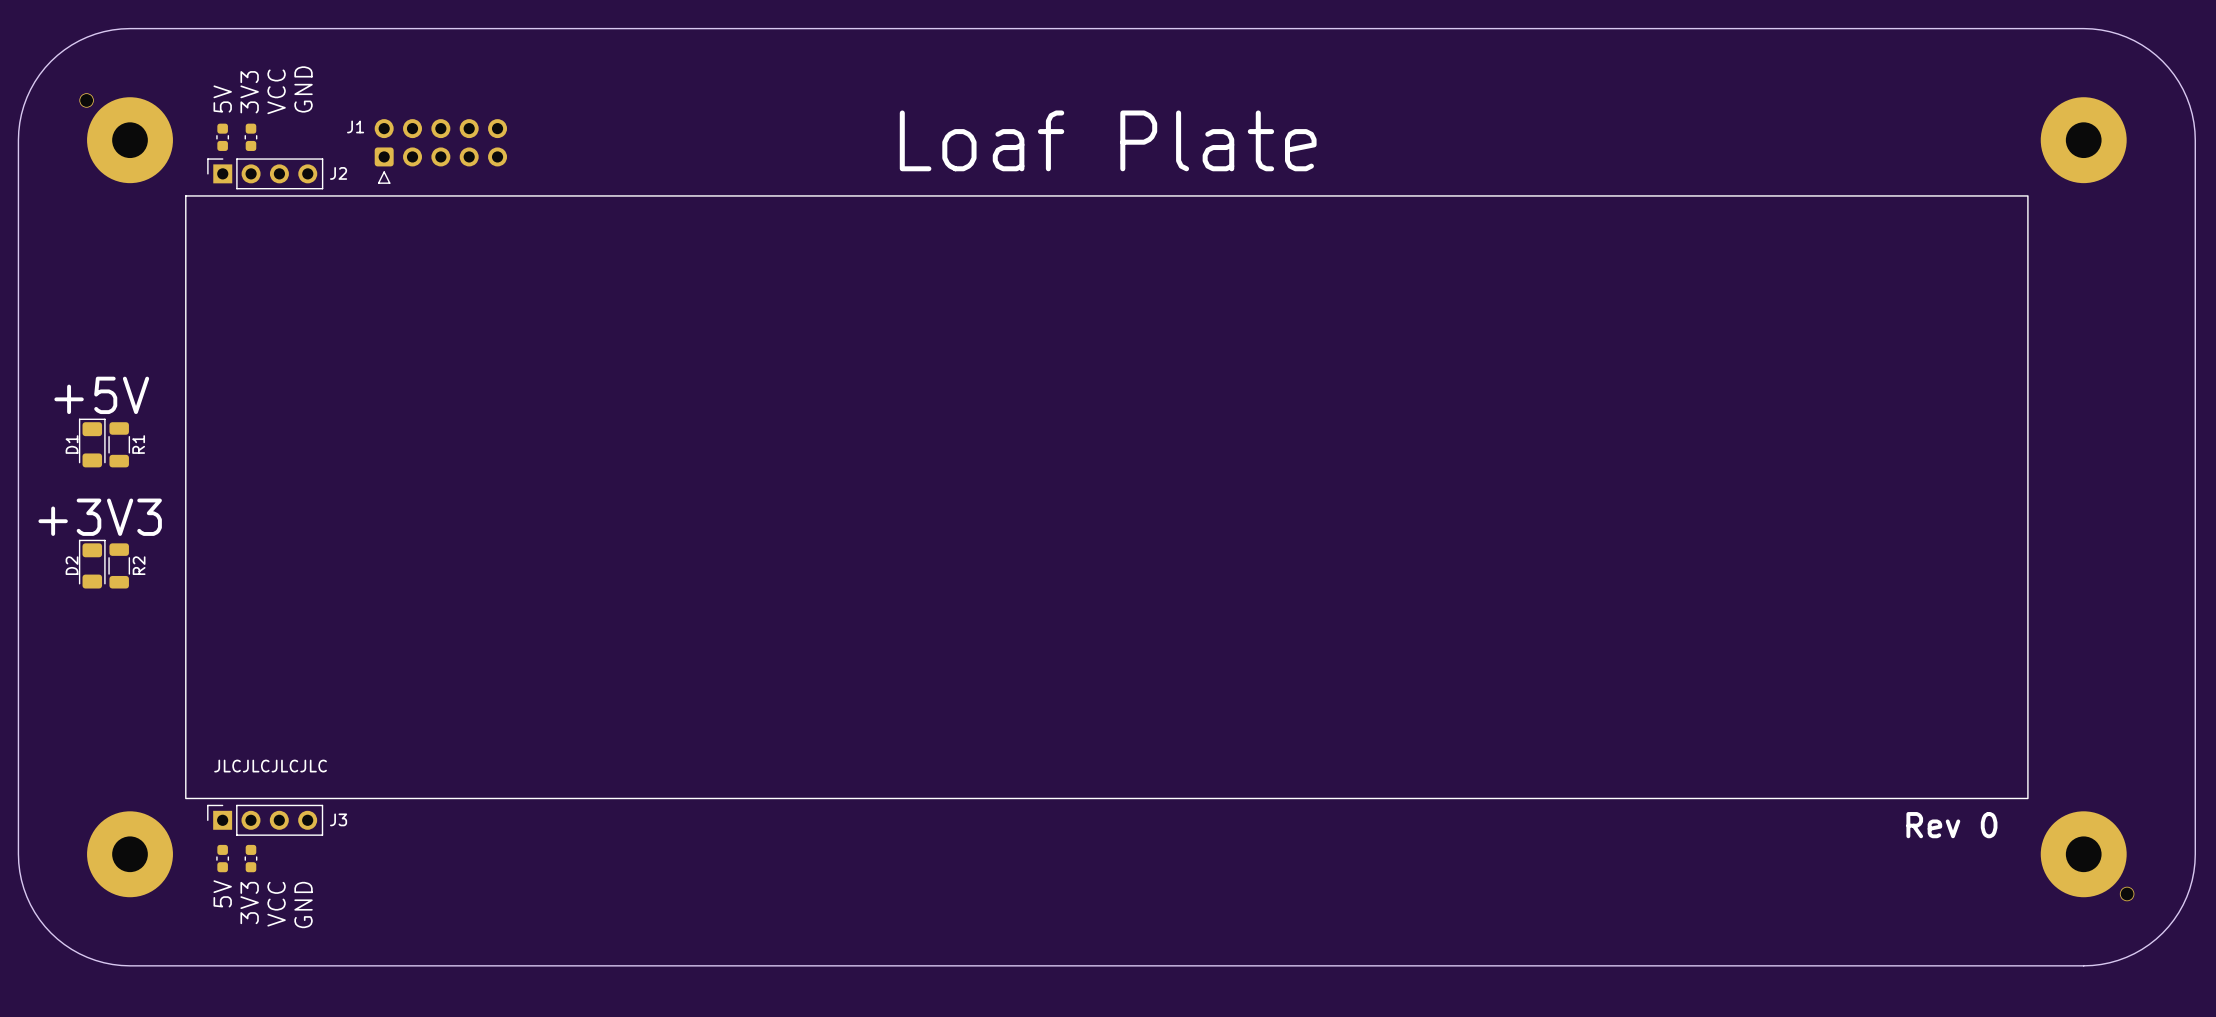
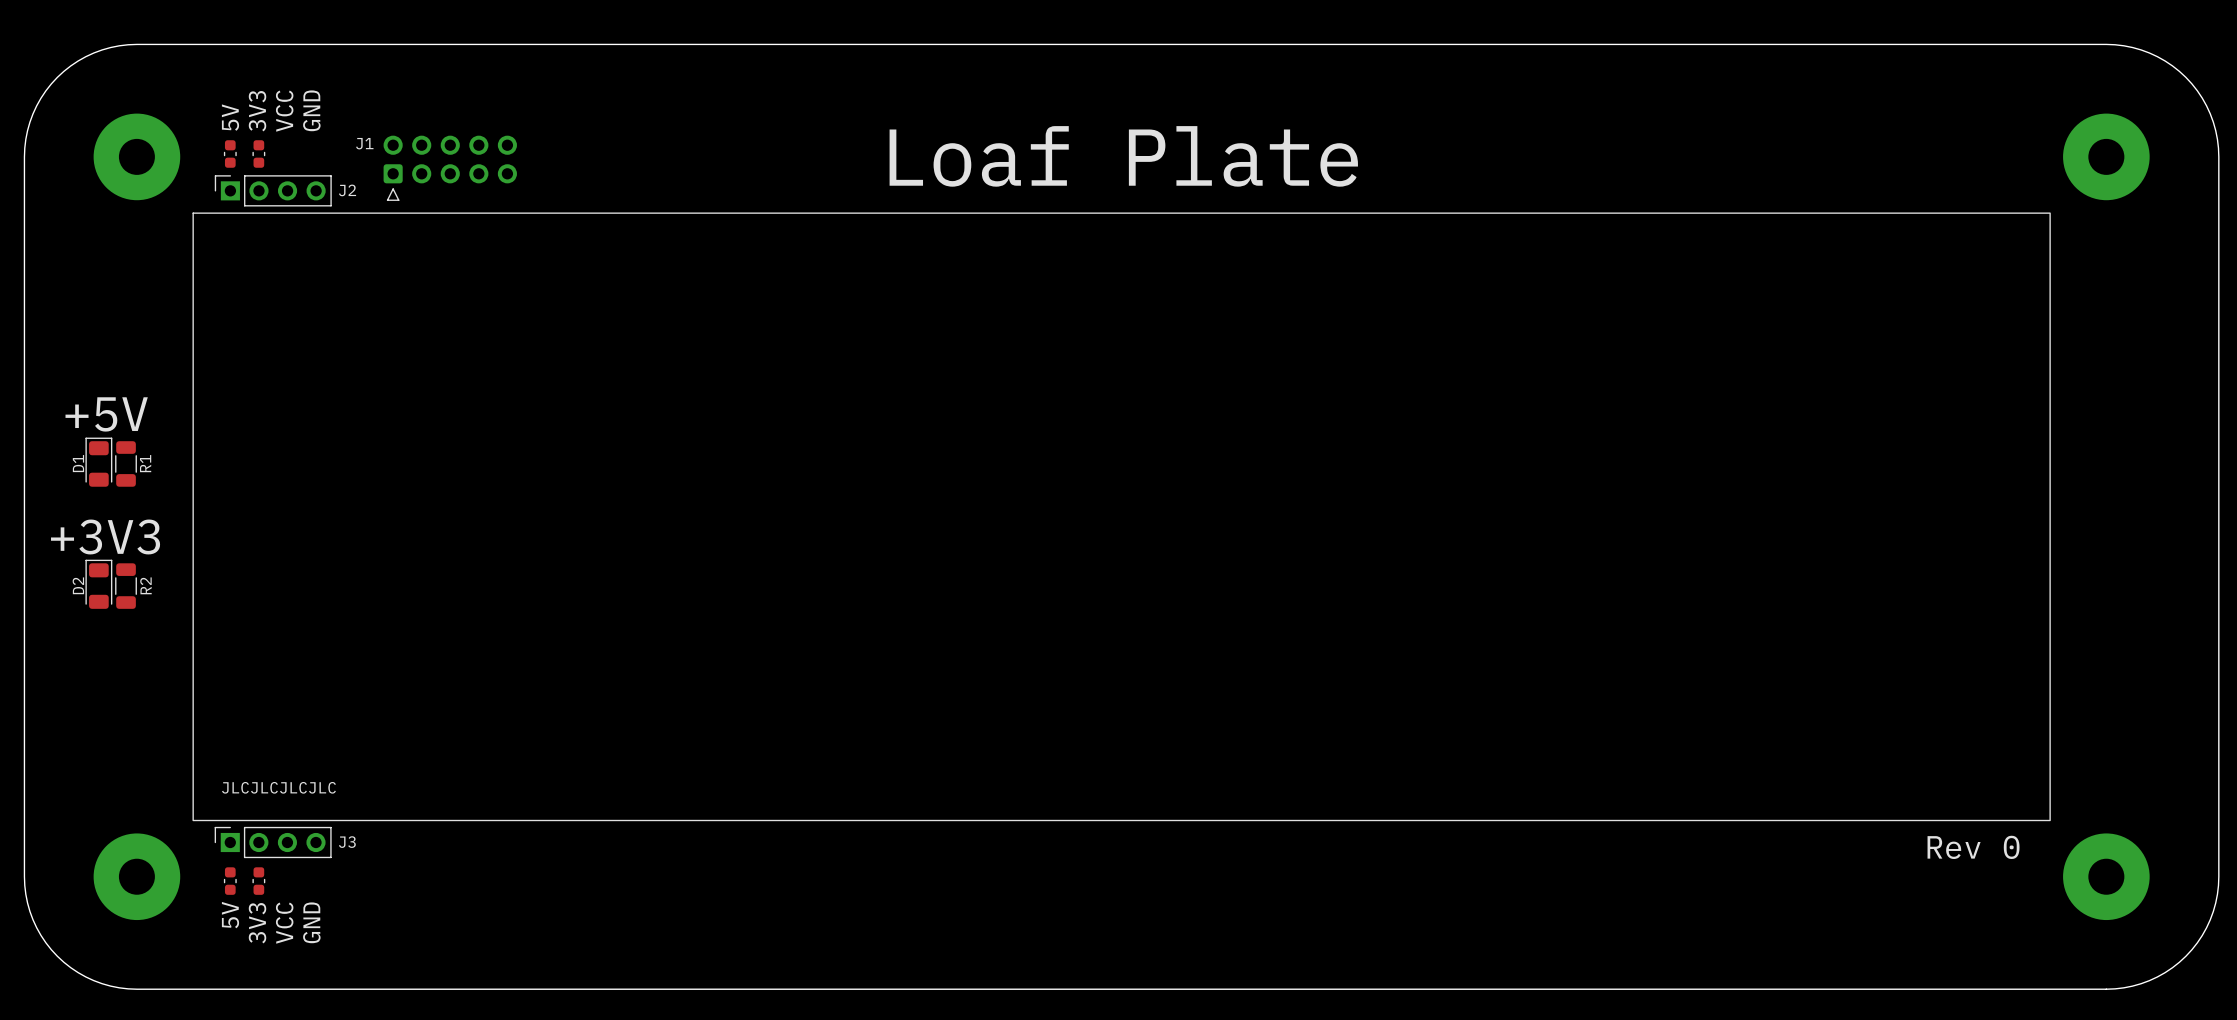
part: (86, 100) -> none
part: (2127, 893) -> none

